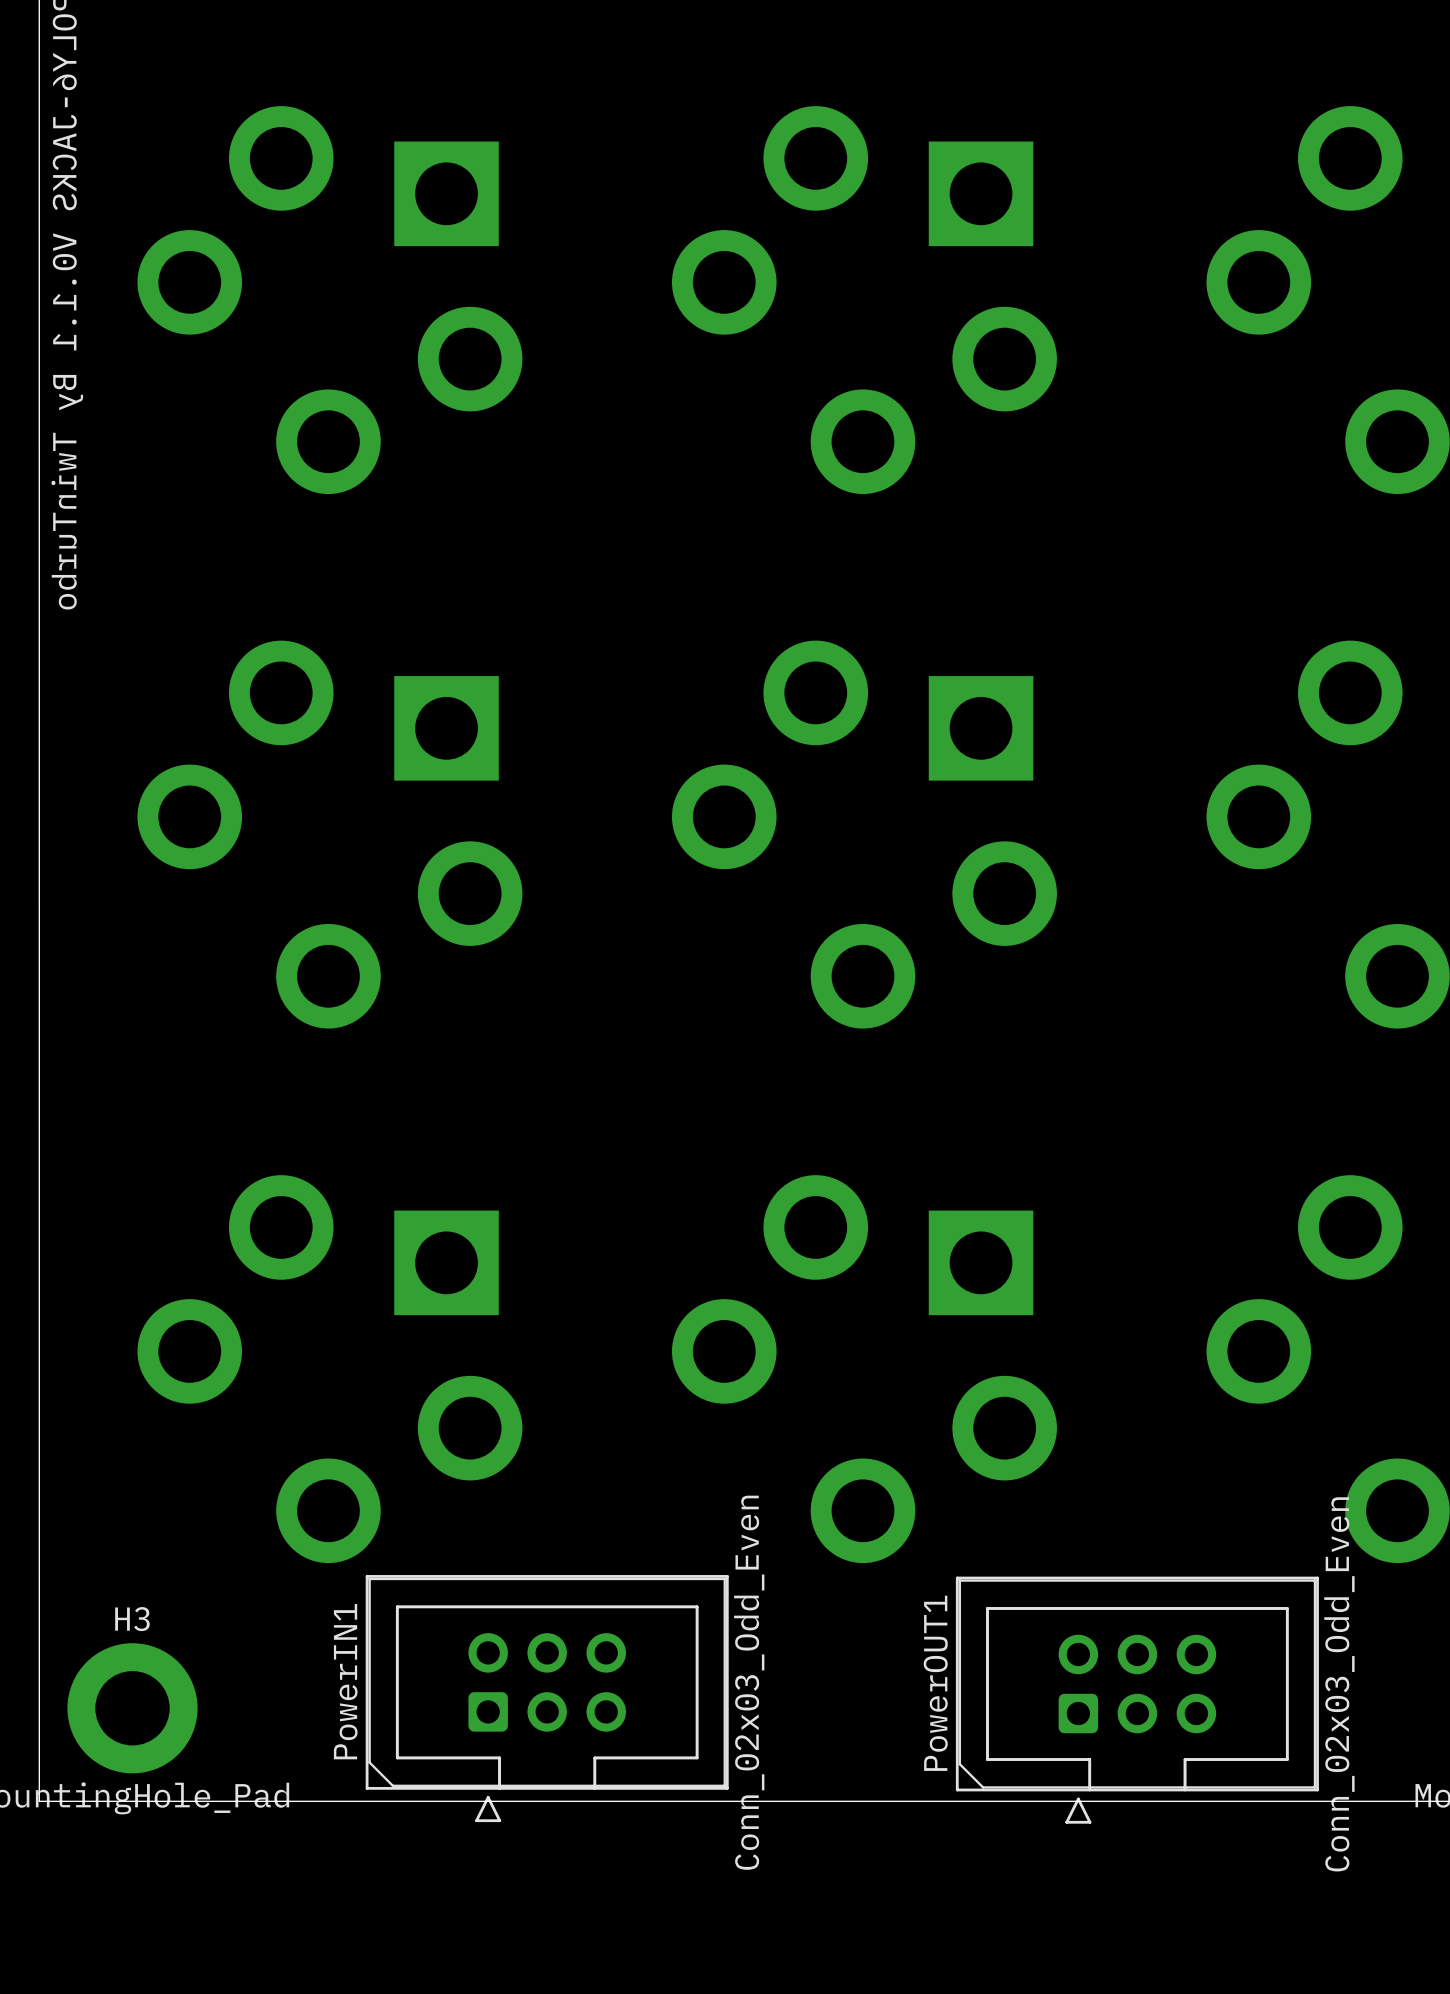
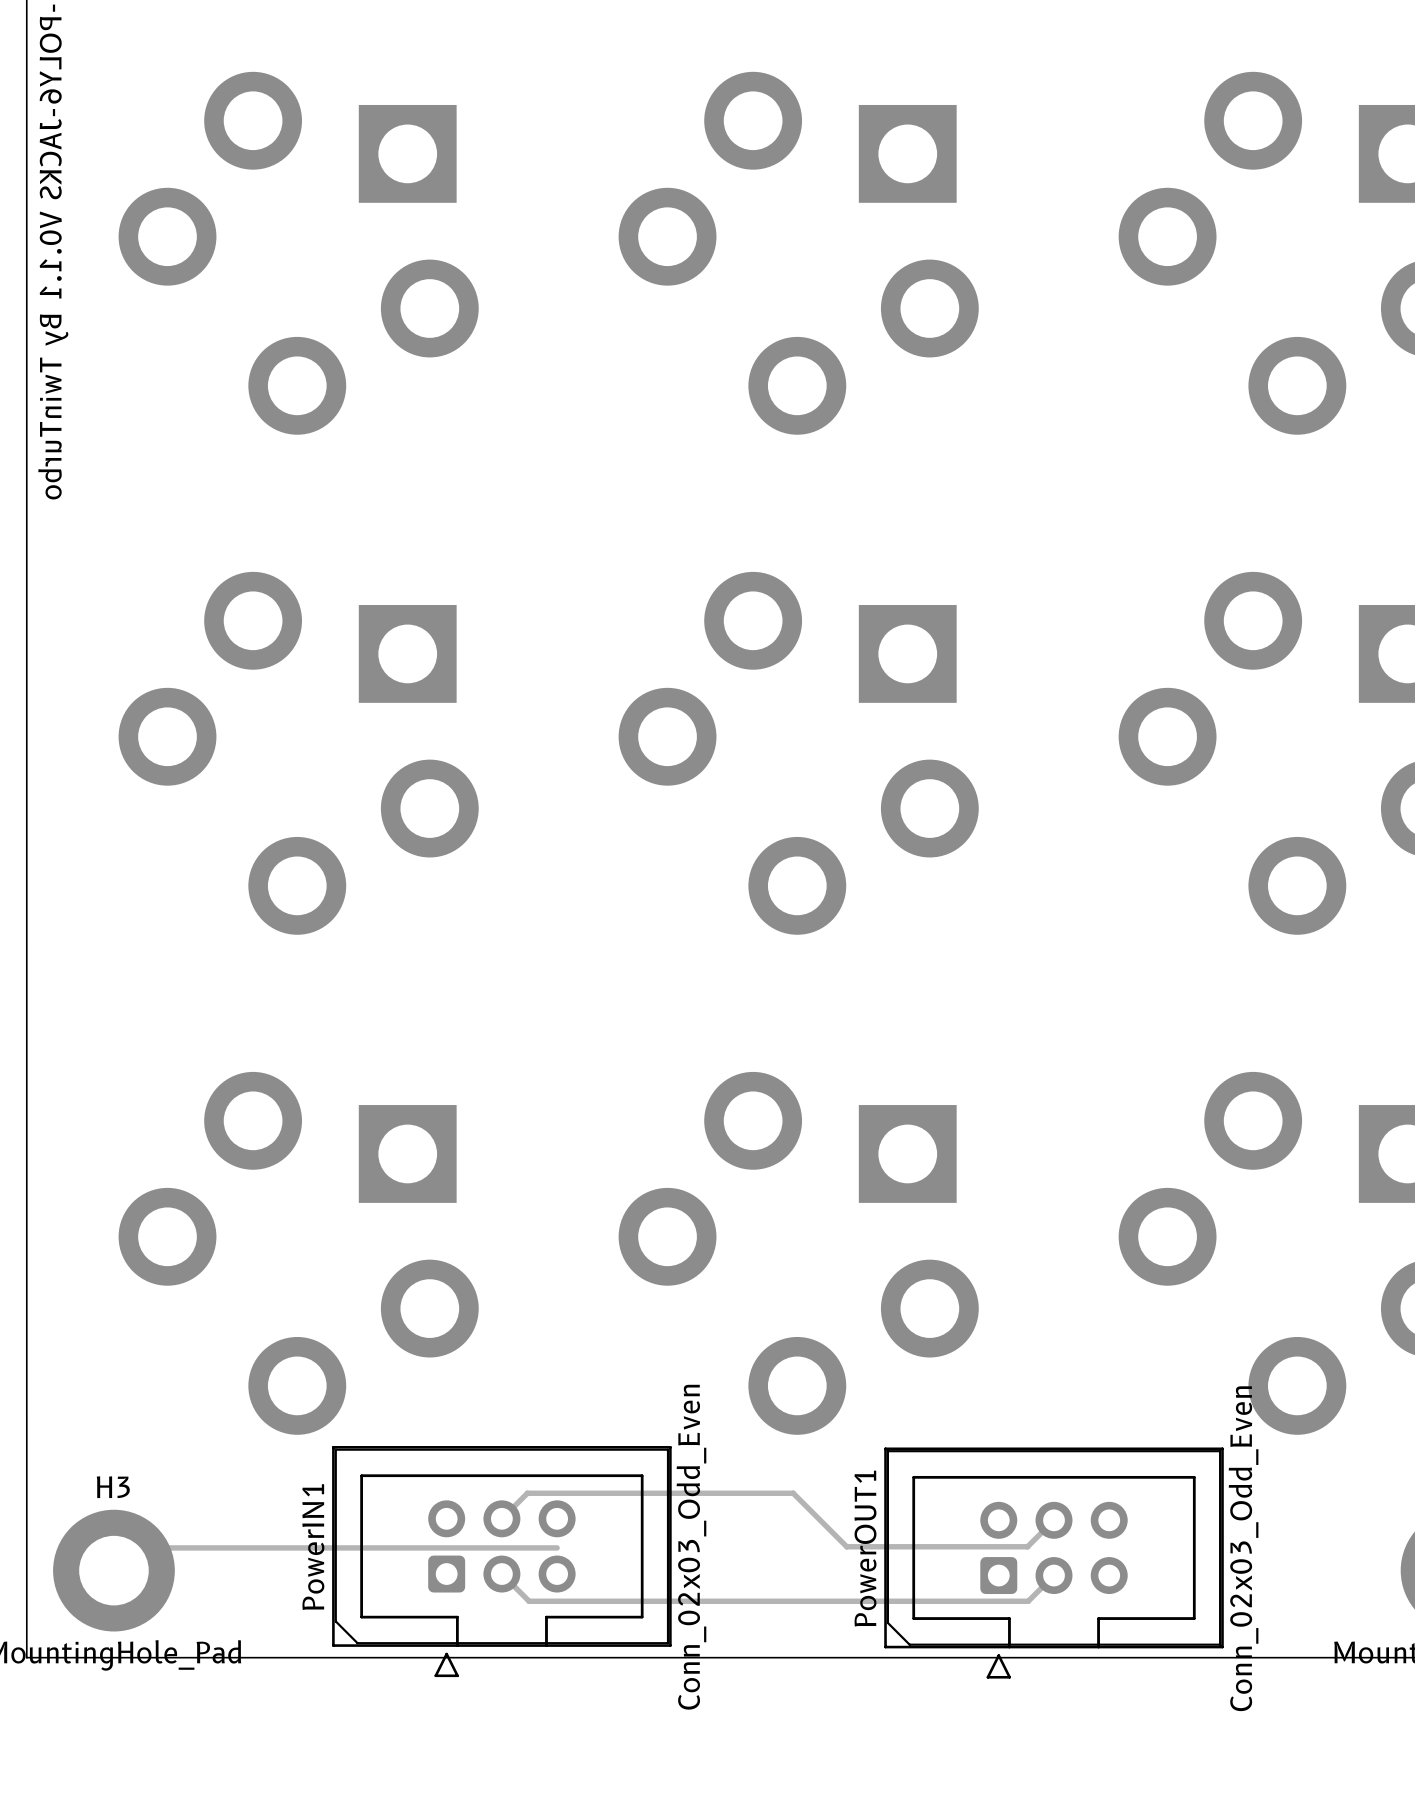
track: none -> (501, 1518) (527, 1493) (793, 1493) (846, 1546) (1027, 1546) (1054, 1520)
track: none -> (557, 1547) (136, 1547) (113, 1570)
track: none -> (501, 1574) (529, 1601) (1028, 1601) (1054, 1575)

